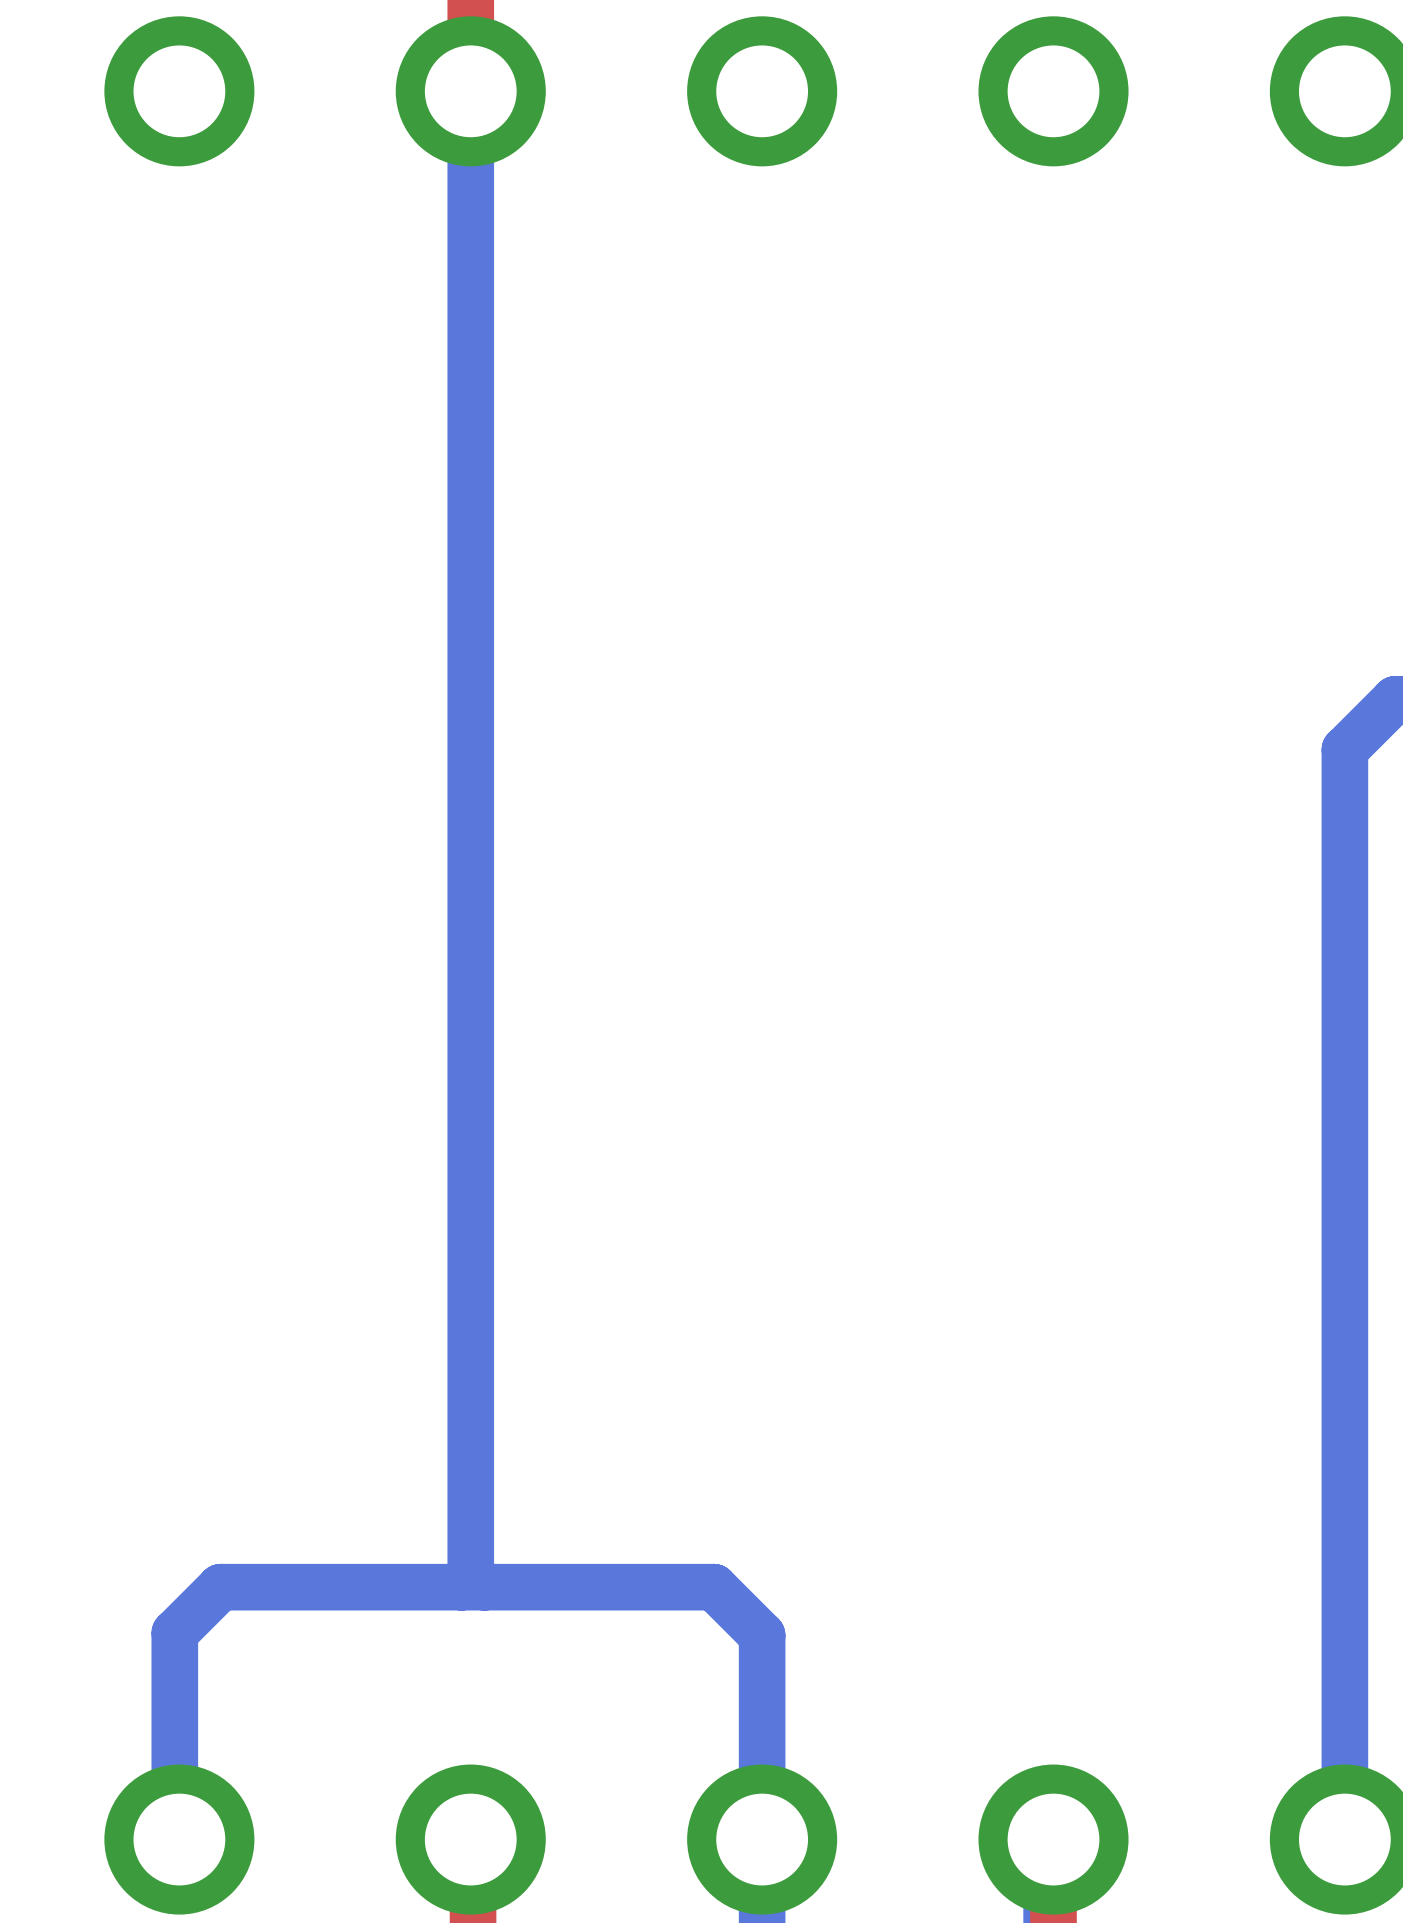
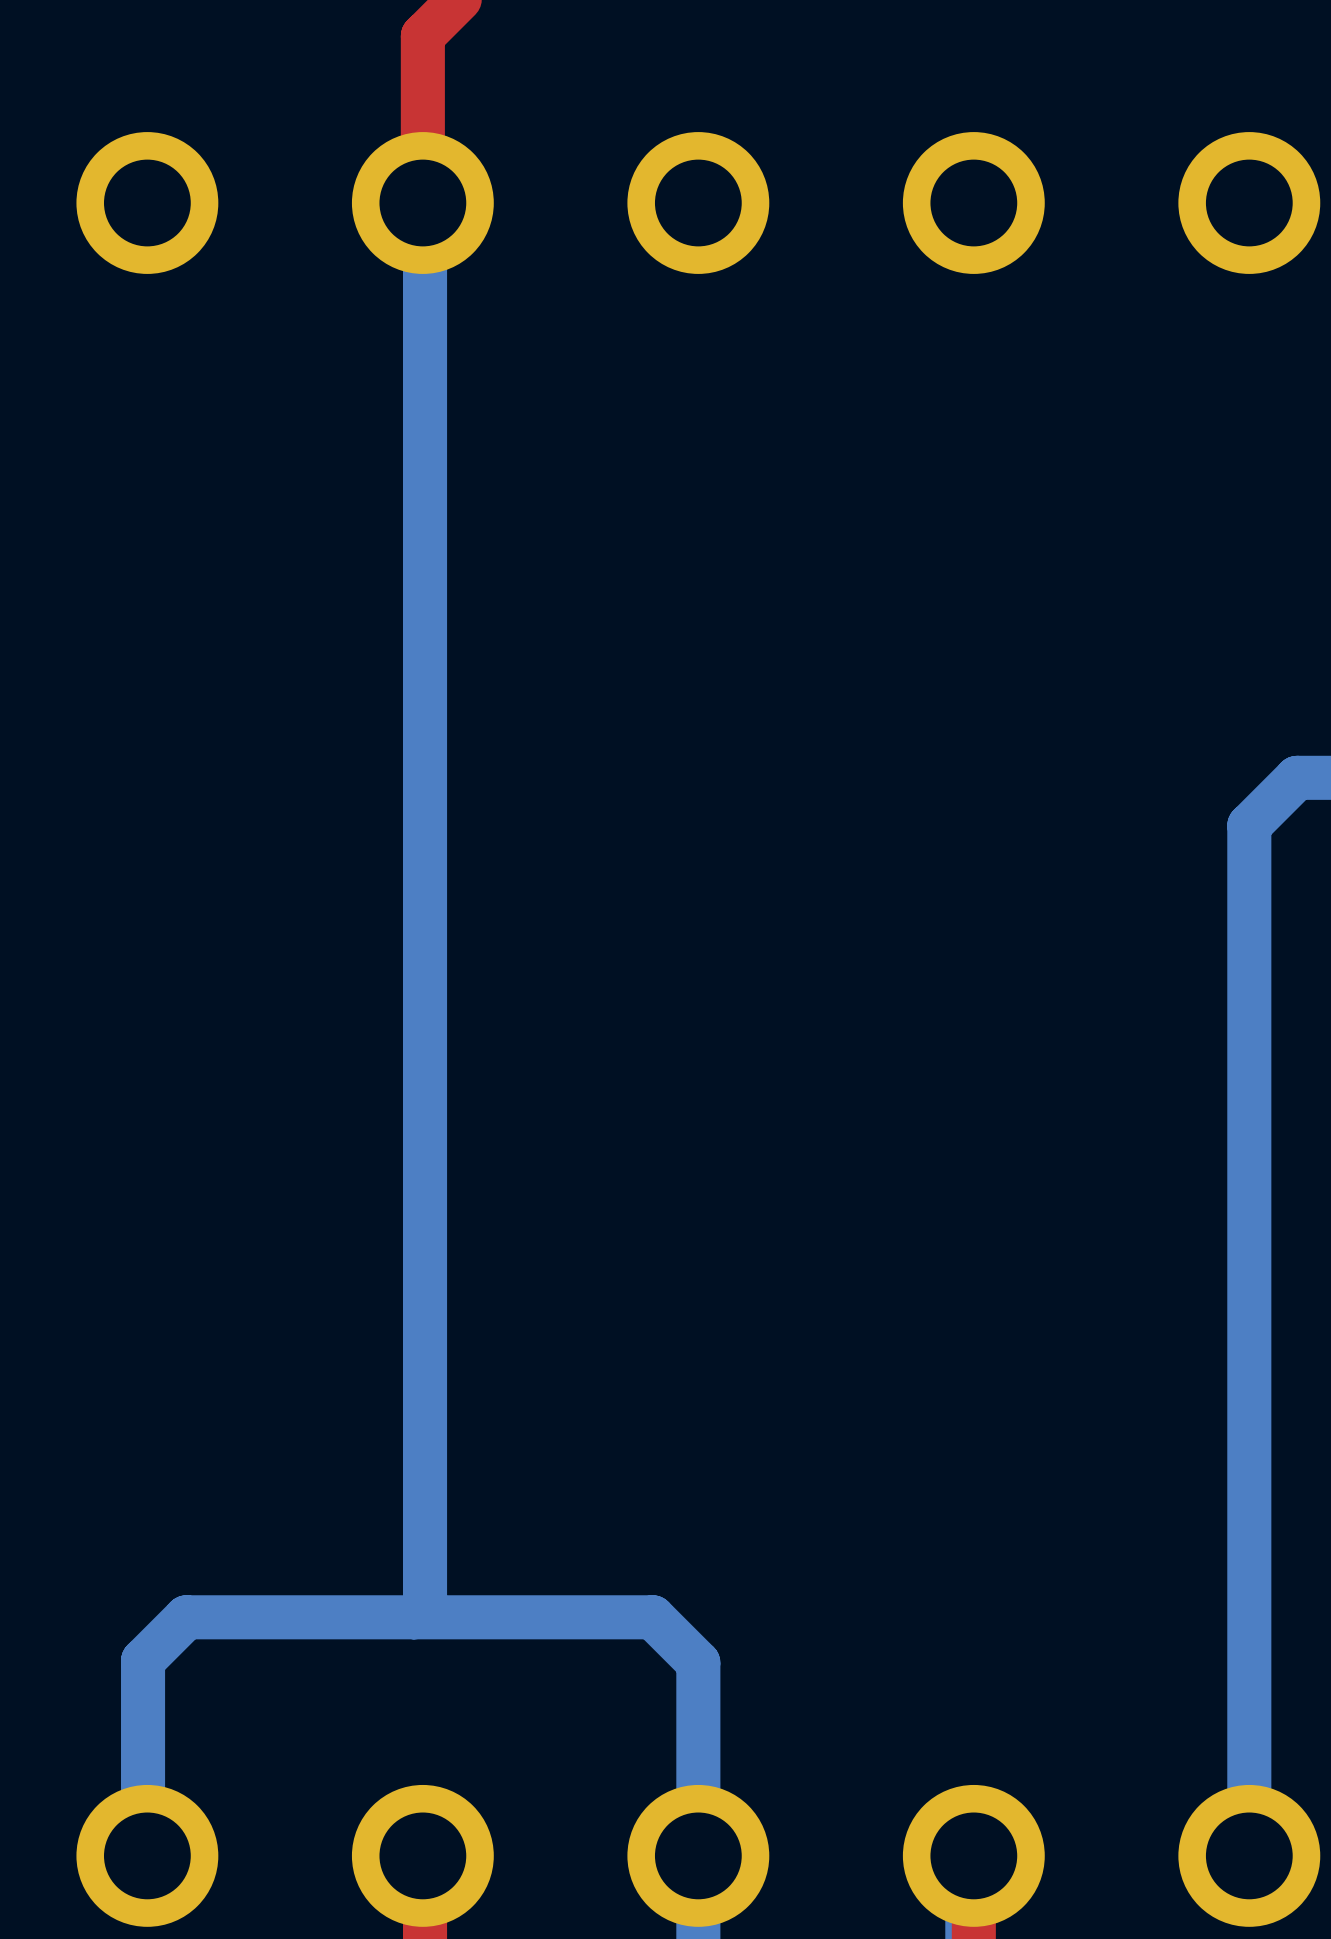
bottom track: (470, 91) (470, 1573) (484, 1587) -> (425, 200) (425, 1606)

